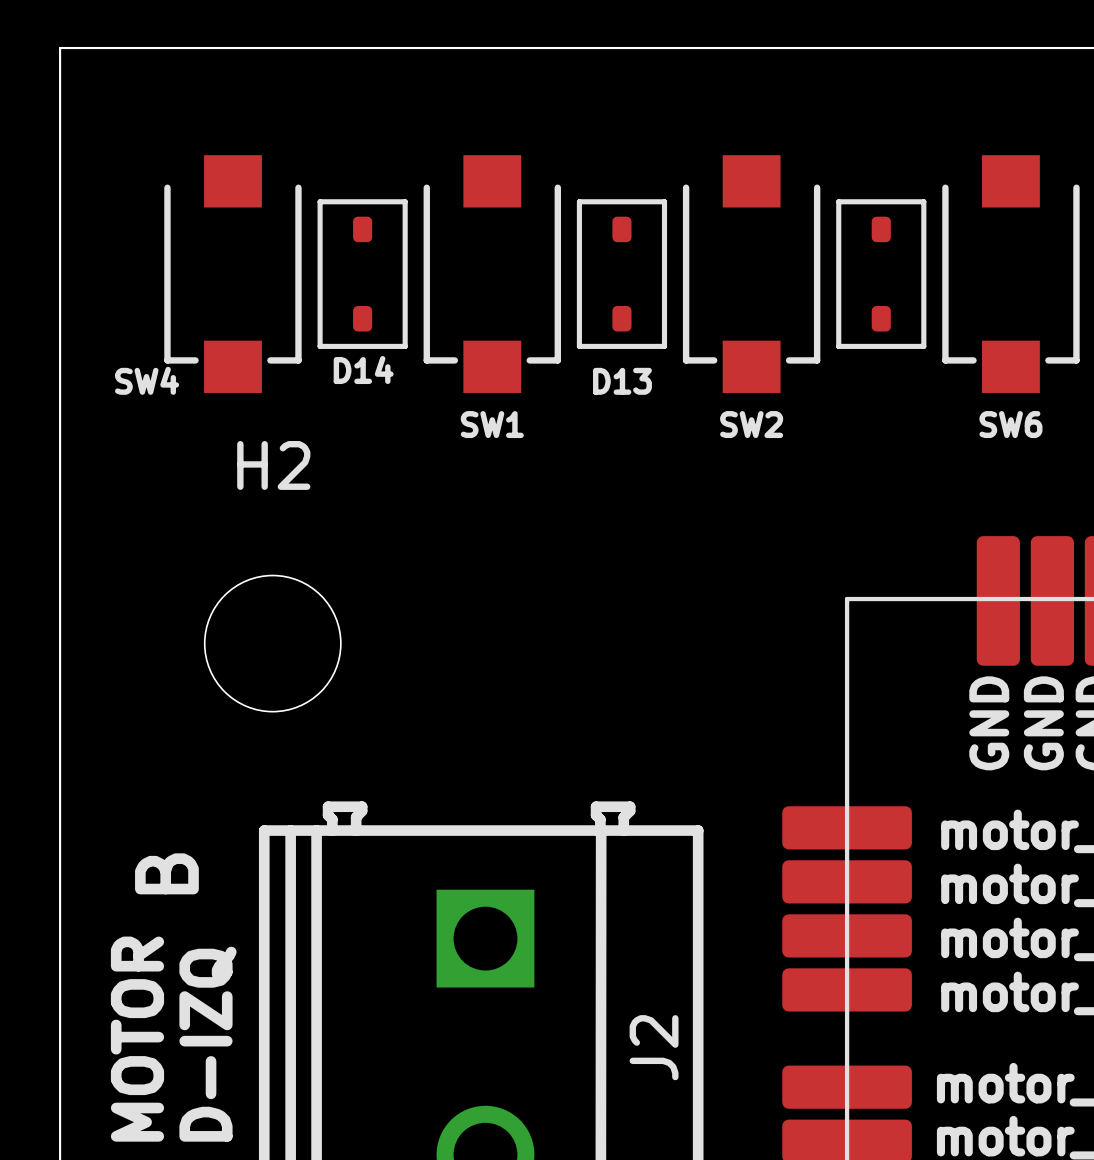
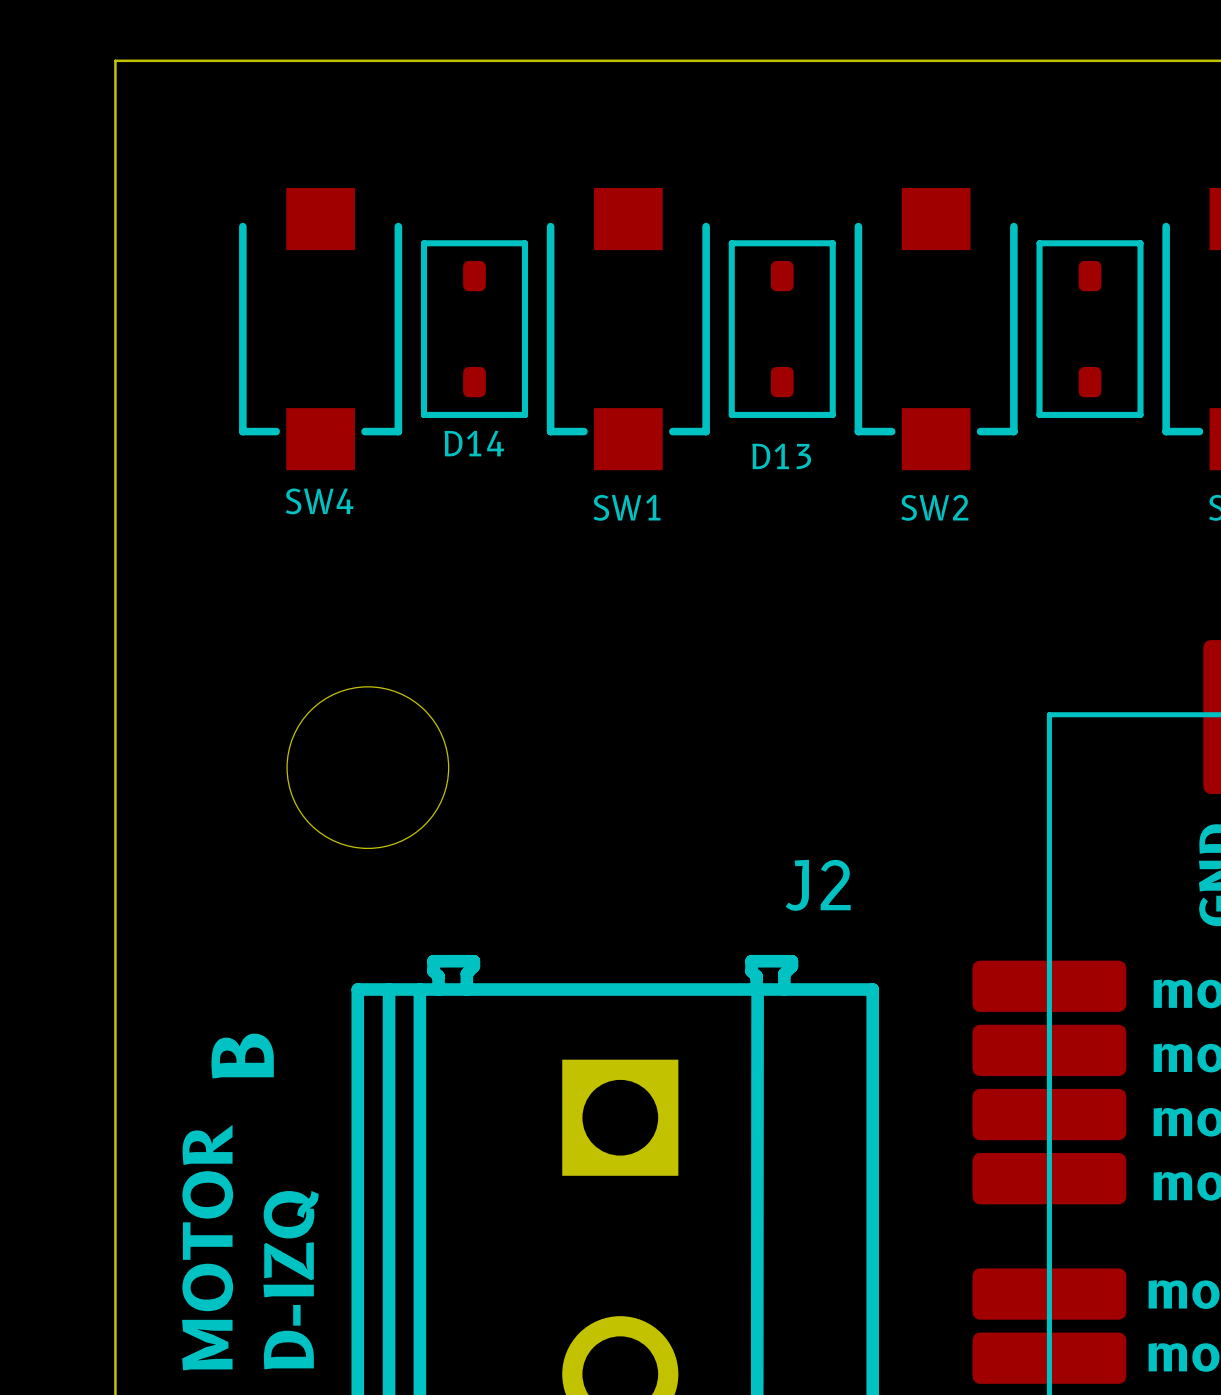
SW4 name position: SW4 (147, 380) -> SW4 (319, 501)
H2 name: H2 (273, 465) -> none
J2 name rotation: 0° (654, 1047) -> 90° clockwise (818, 885)
J2 name position: J2 (654, 1047) -> J2 (818, 885)

